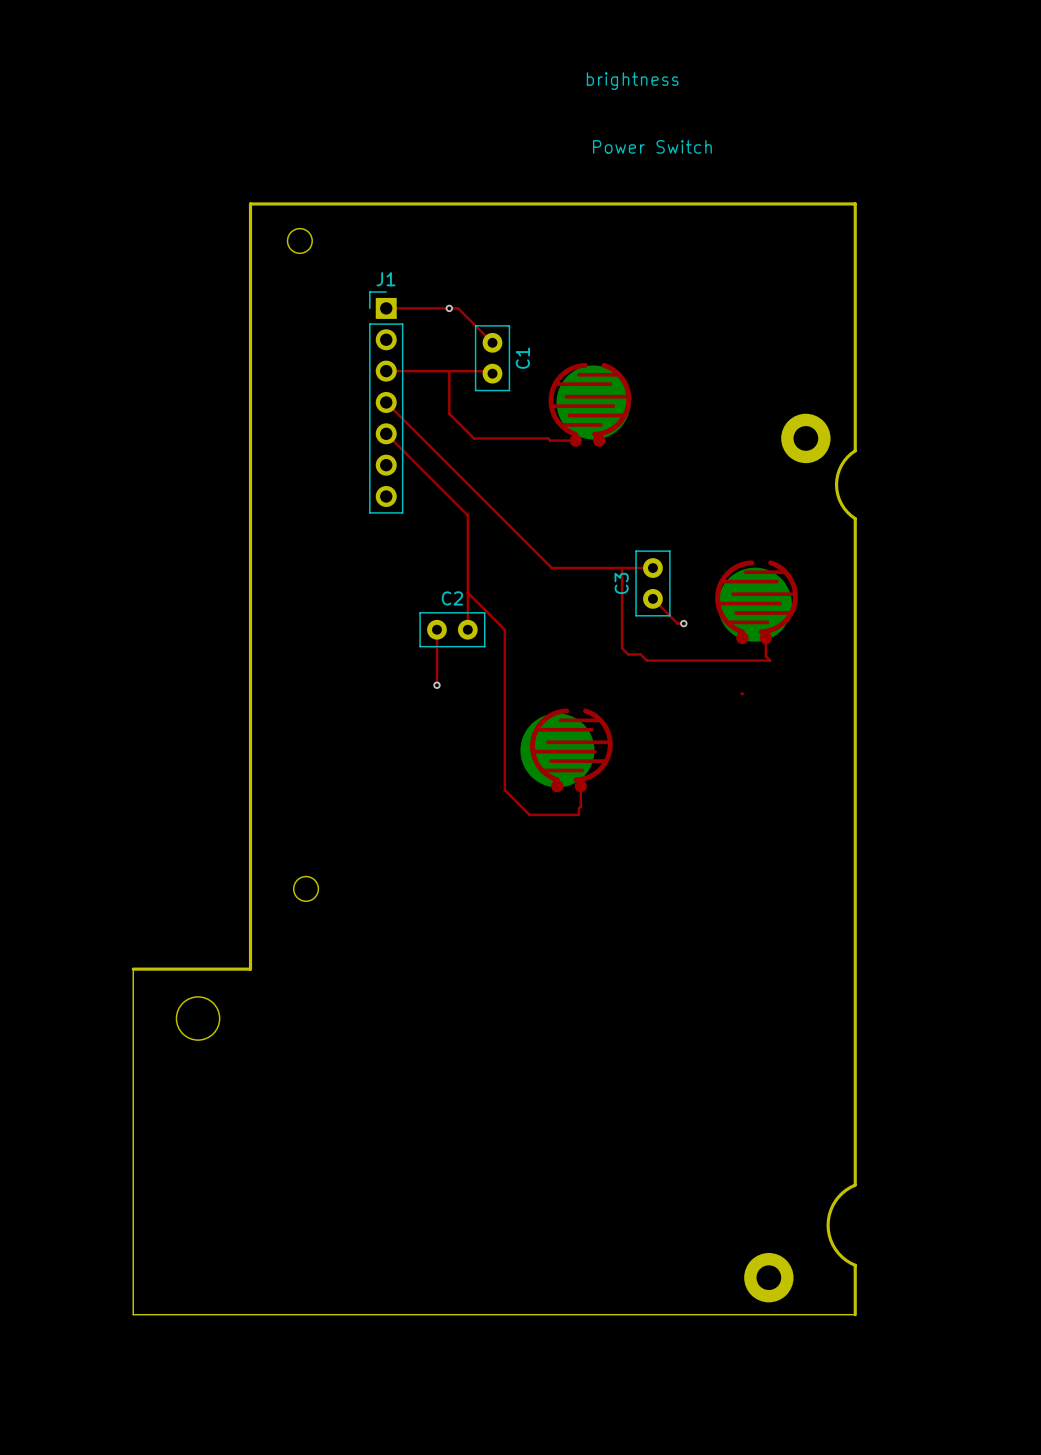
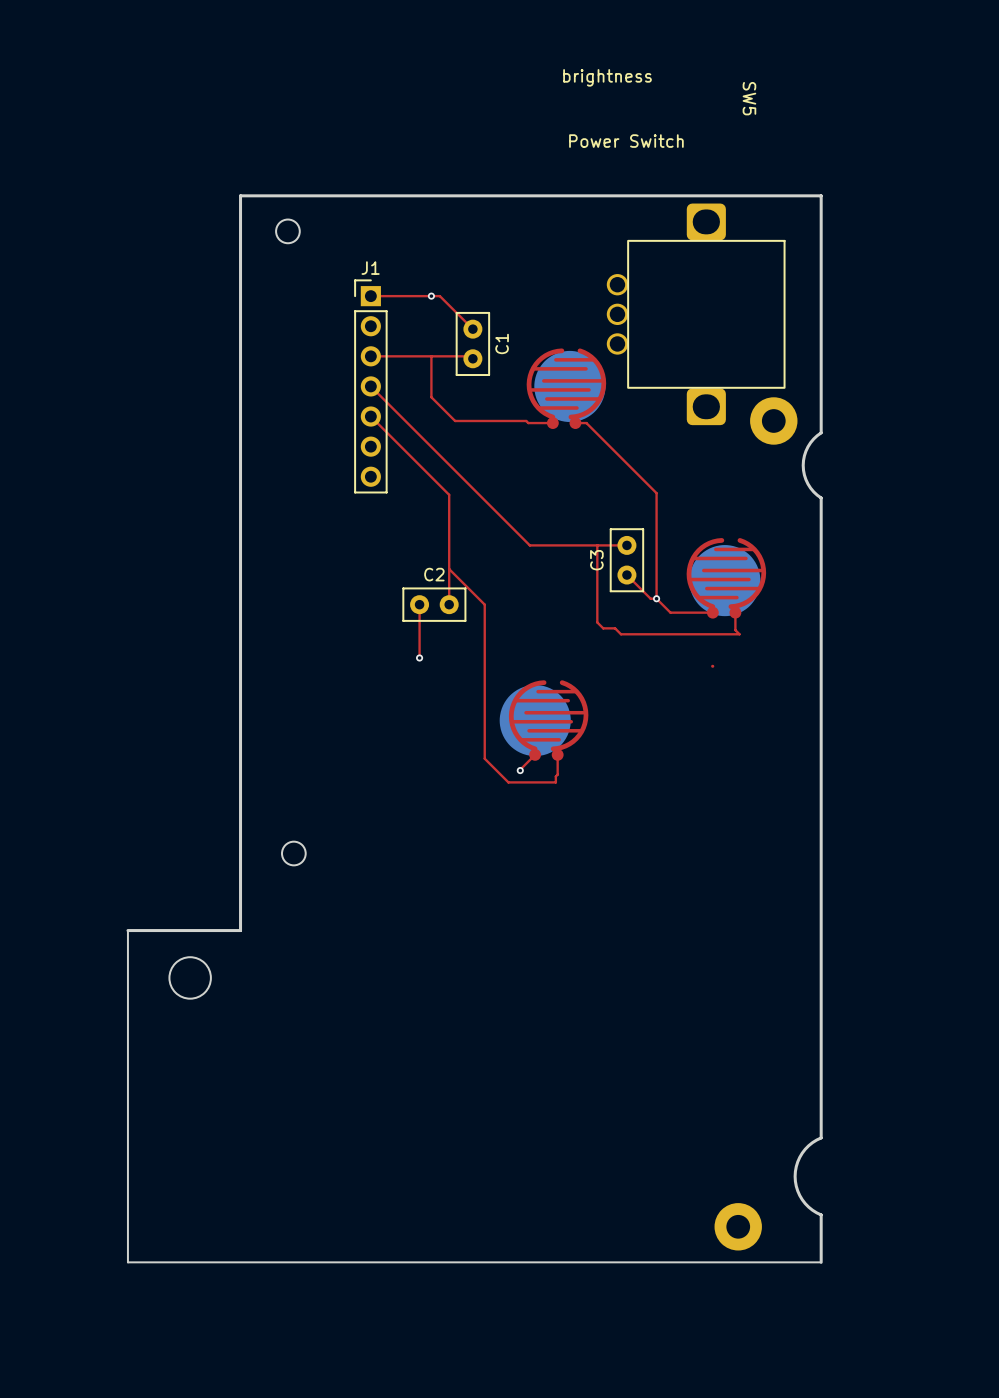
SW5: none -> (695, 314)
top track: none -> (575, 423) (586, 423) (656, 493) (656, 598) (670, 612) (712, 612)
top track: none -> (535, 754) (520, 770)
via: none -> (520, 770)

